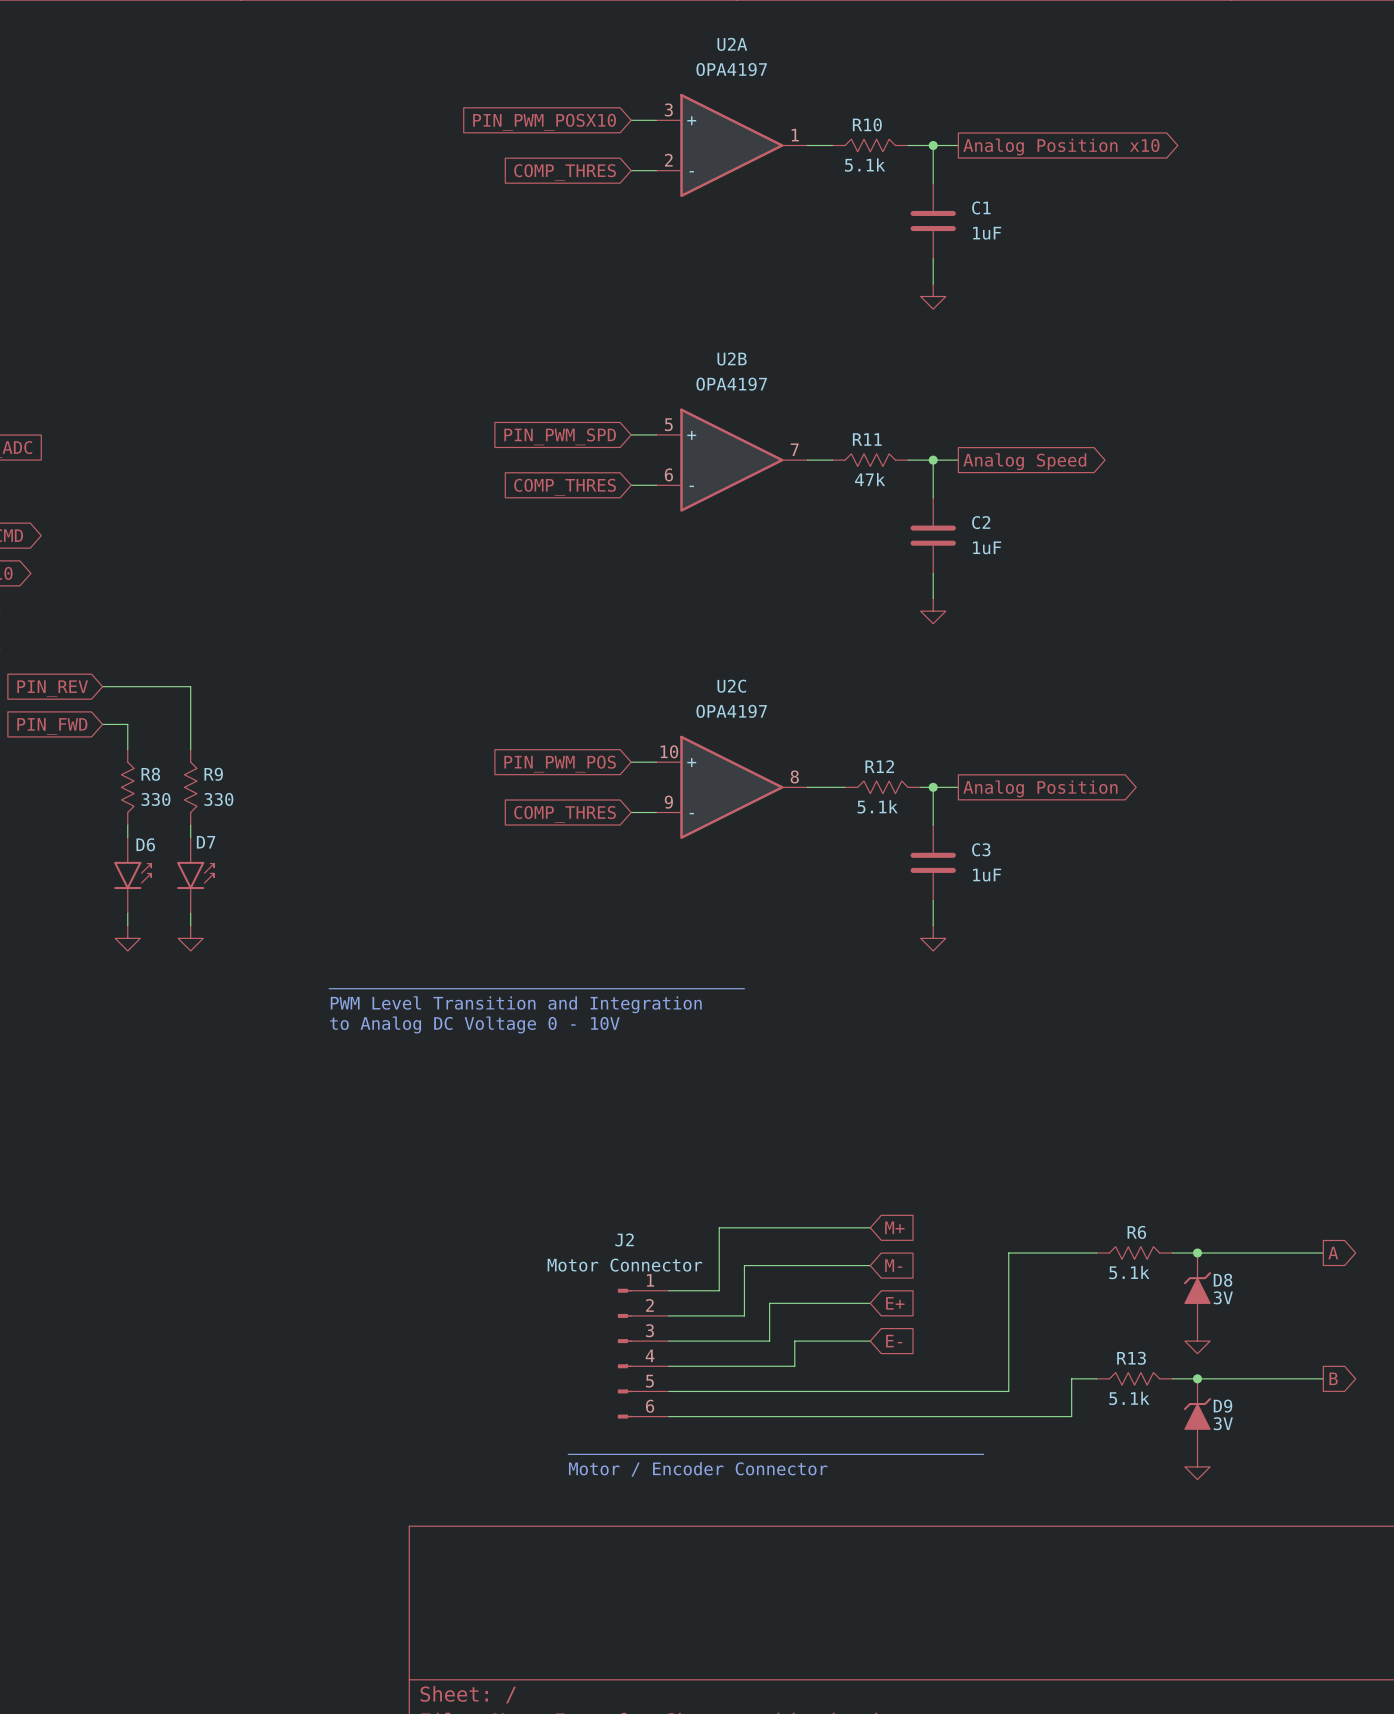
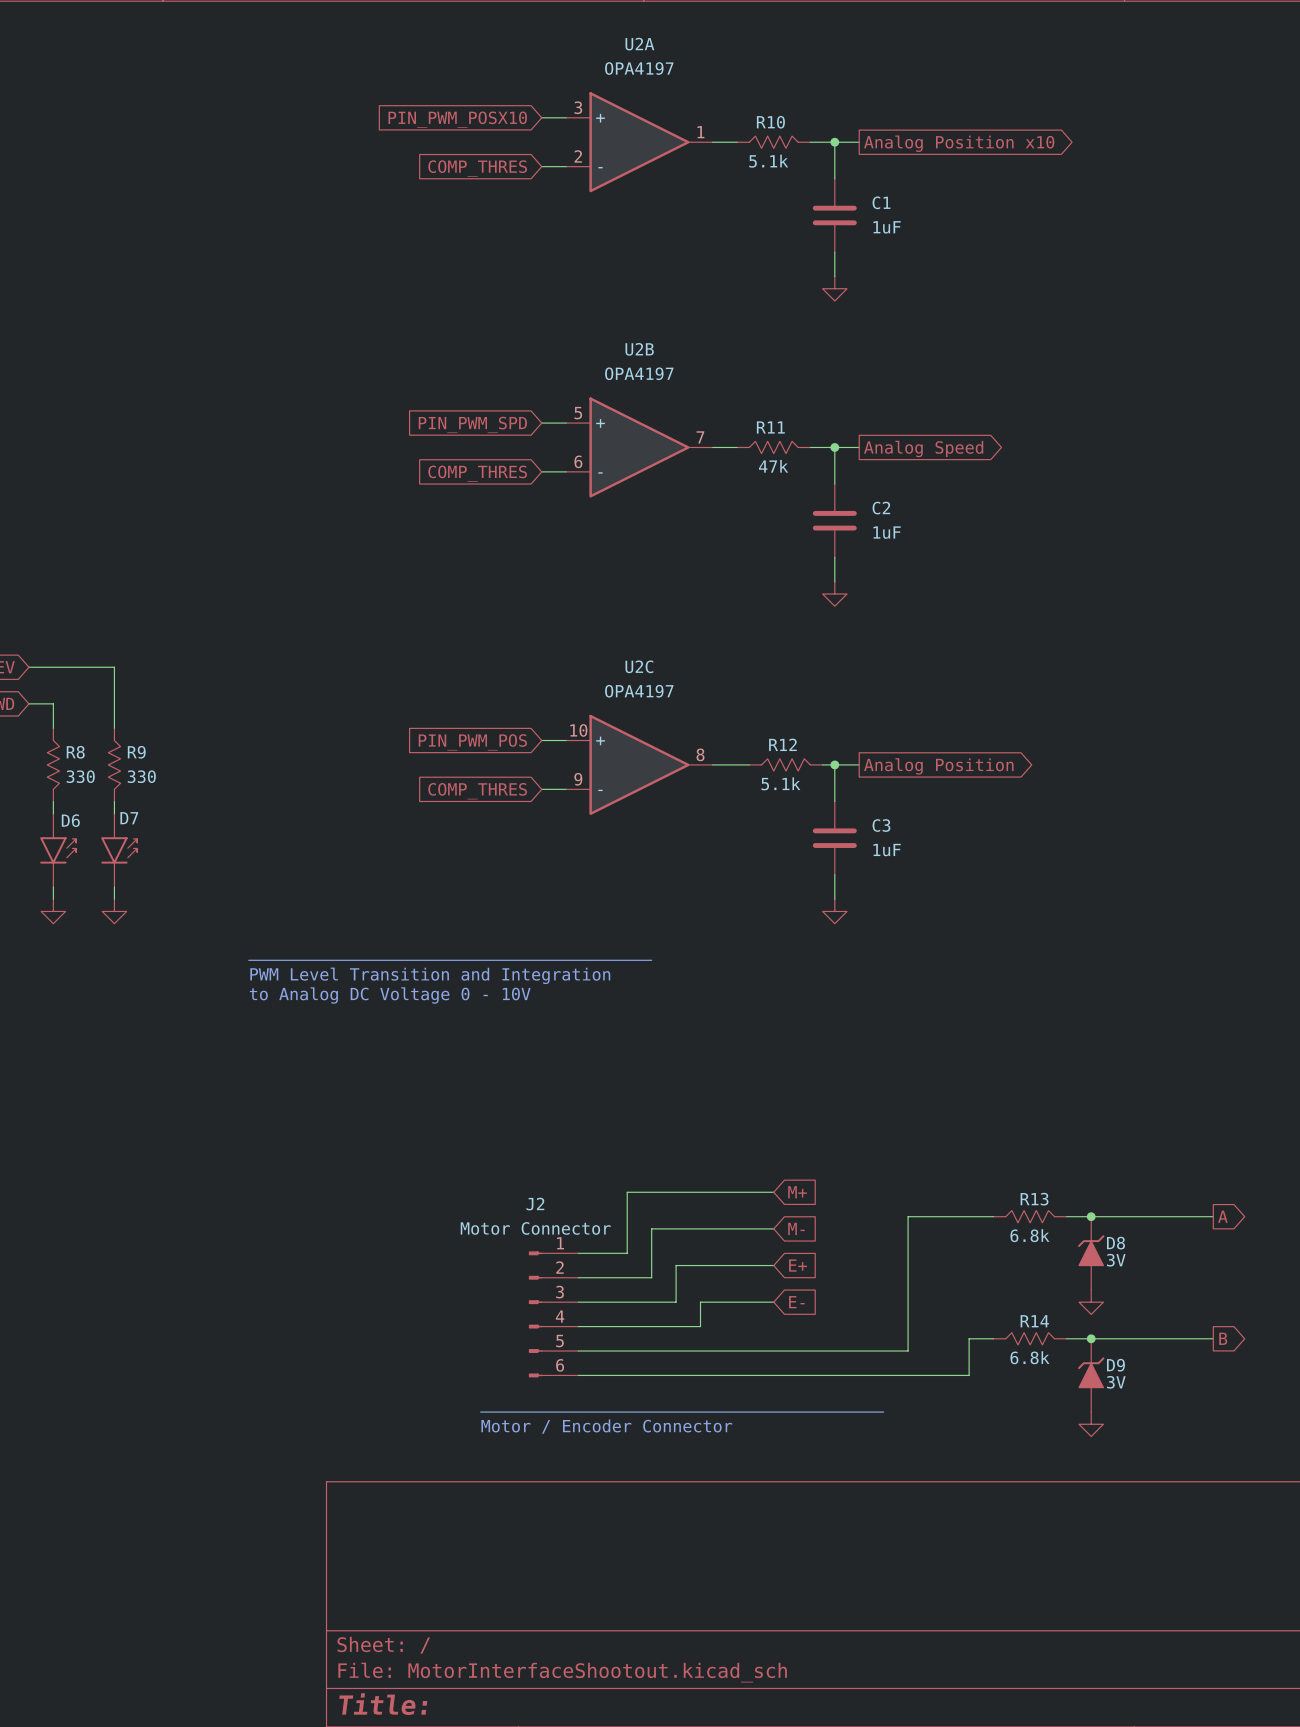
R6 name: R6 (1136, 1232) -> R13 (1034, 1199)
R6 value: 5.1k (1129, 1272) -> 6.8k (1029, 1235)
R13 name: R13 (1131, 1358) -> R14 (1034, 1321)
R13 value: 5.1k (1129, 1398) -> 6.8k (1029, 1357)

